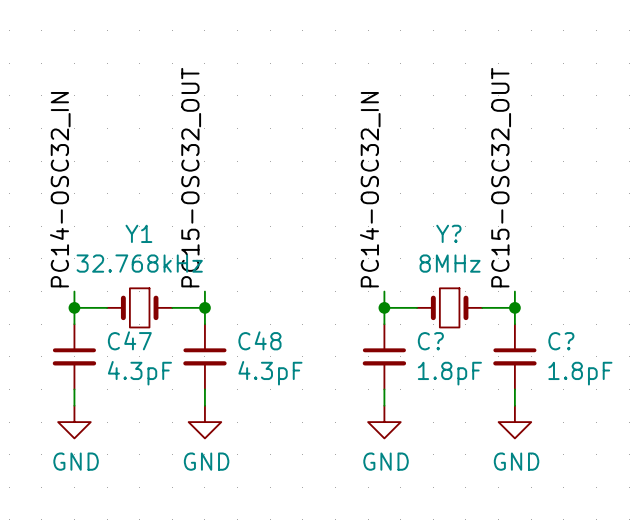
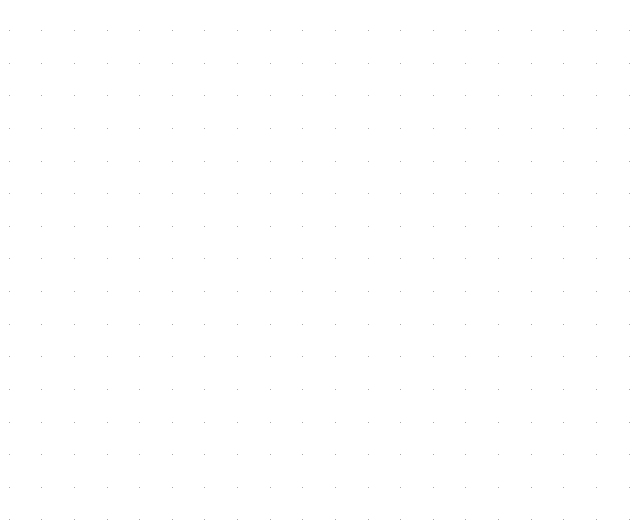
label: PC15-OSC32_OUT (191, 177) -> none
label: PC15-OSC32_OUT (501, 177) -> none
label: PC14-OSC32_IN (60, 189) -> none
label: PC14-OSC32_IN (370, 189) -> none
wire: (74, 291) (74, 324) -> none
wire: (204, 291) (204, 324) -> none
wire: (384, 291) (384, 324) -> none
wire: (514, 291) (514, 324) -> none
wire: (74, 307) (107, 307) -> none
junction: (74, 307) -> none
Y1: 32.768kHz (139, 307) -> none
wire: (172, 307) (204, 307) -> none
junction: (204, 307) -> none
wire: (384, 307) (417, 307) -> none
junction: (384, 307) -> none
Y?: 8MHz (449, 307) -> none
wire: (482, 307) (514, 307) -> none
junction: (514, 307) -> none
C47: 4.3pF (74, 356) -> none
C48: 4.3pF (204, 356) -> none
C?: 1.8pF (384, 356) -> none
C?: 1.8pF (514, 356) -> none
wire: (74, 389) (74, 405) -> none
wire: (204, 389) (204, 405) -> none
wire: (384, 389) (384, 405) -> none
wire: (514, 389) (514, 405) -> none
power symbol: GND (74, 422) -> none
power symbol: GND (204, 422) -> none
power symbol: GND (384, 422) -> none
power symbol: GND (514, 422) -> none

